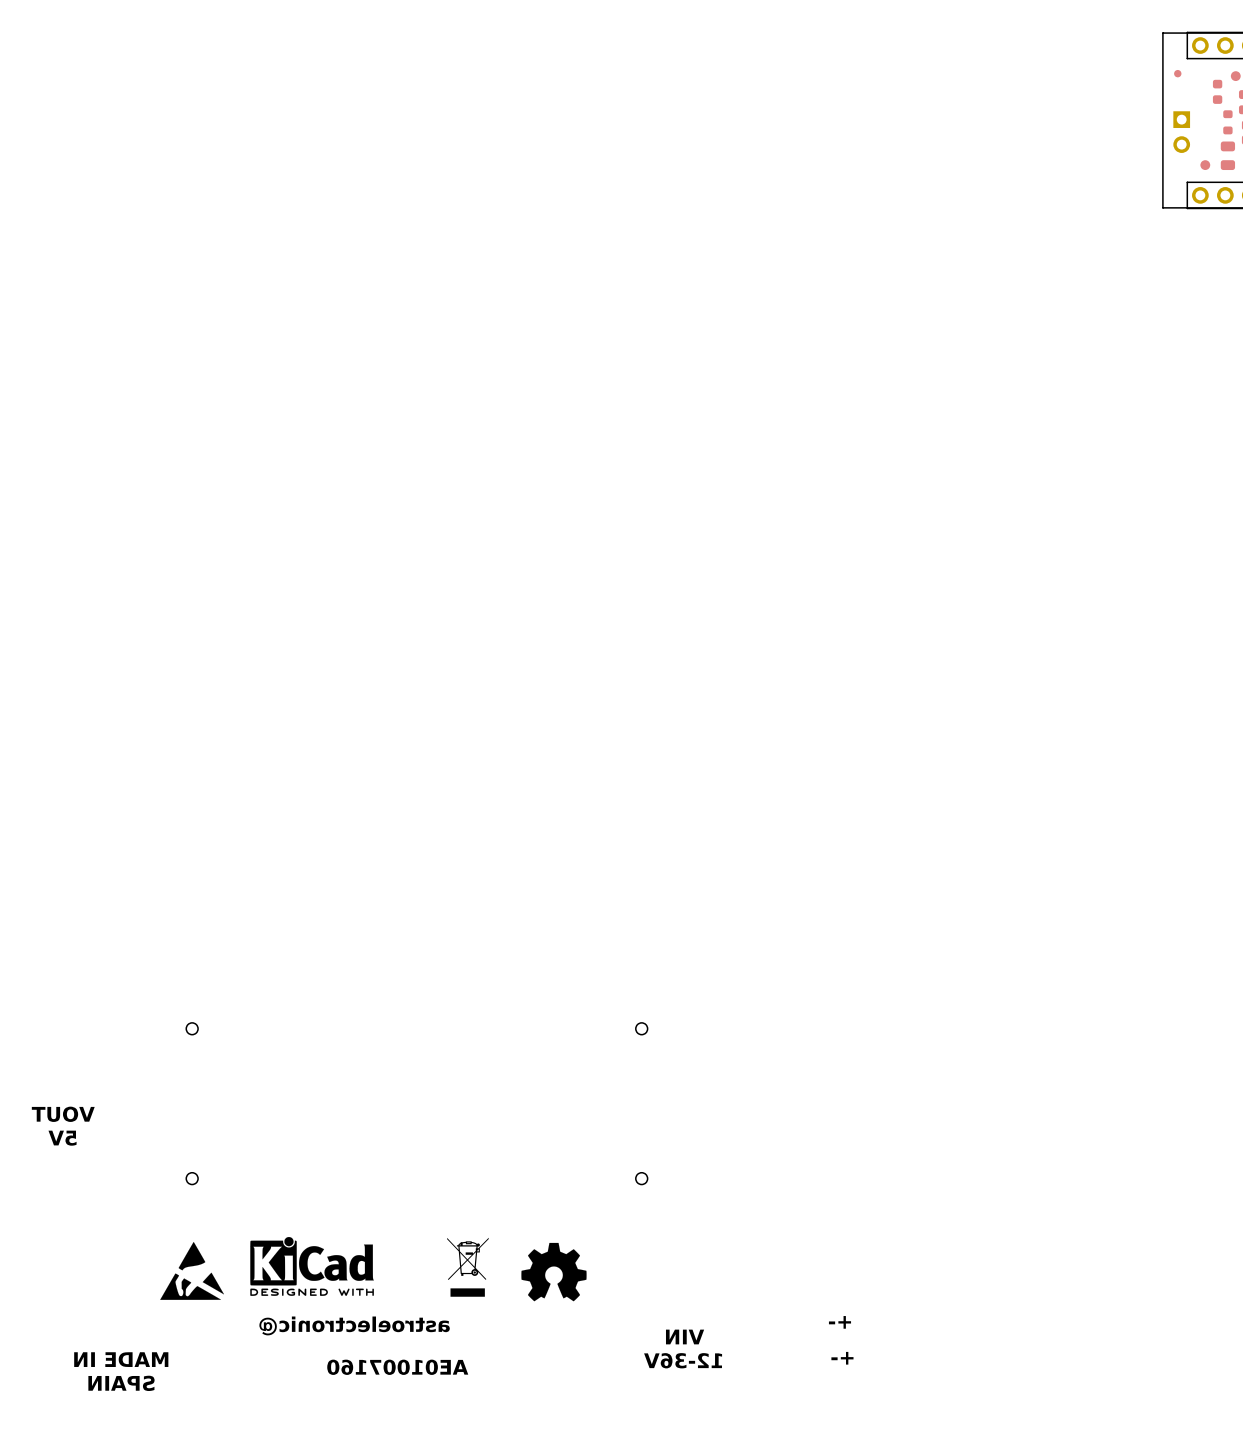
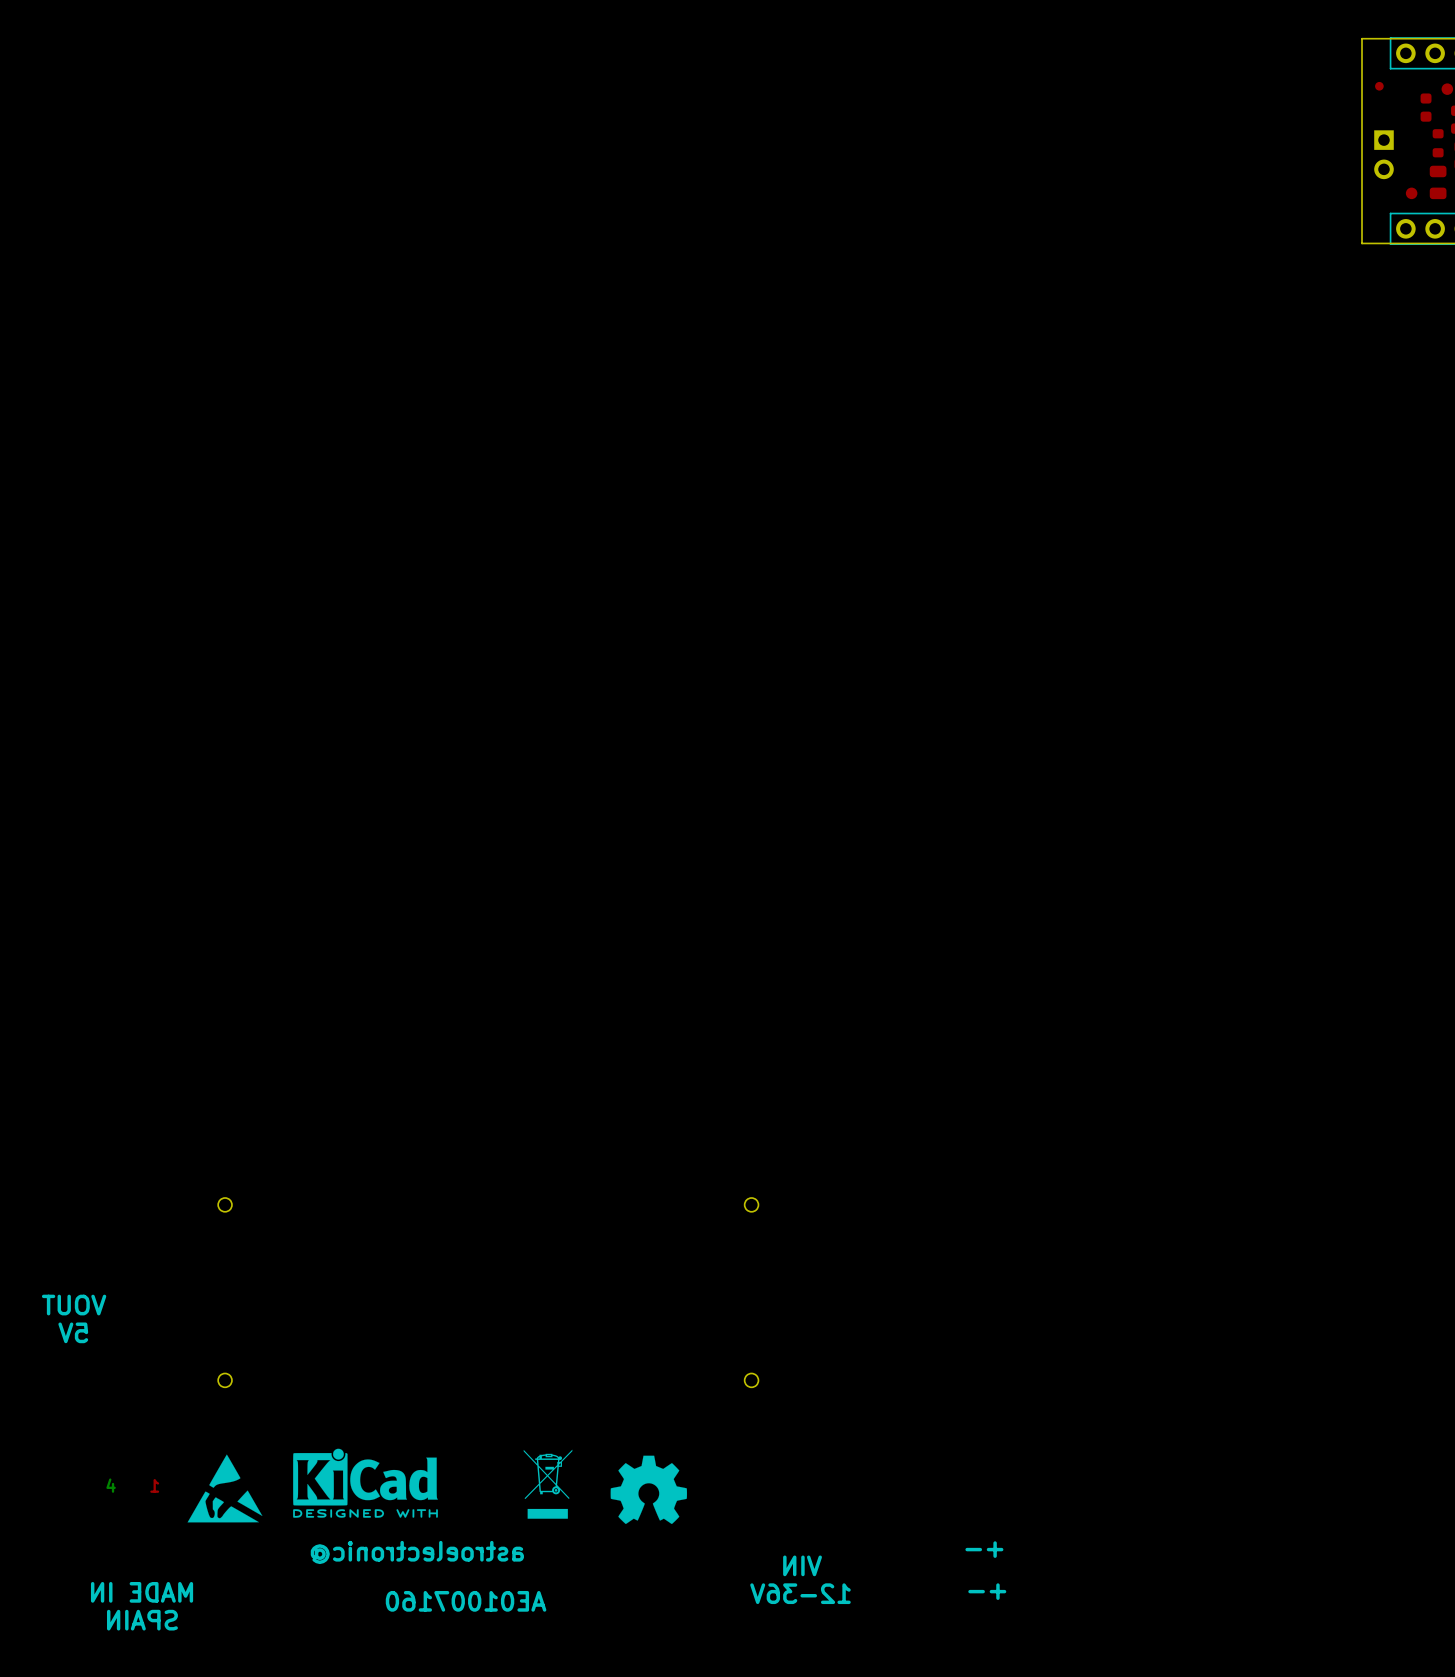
drawing: none -> [106, 1478, 160, 1493]

